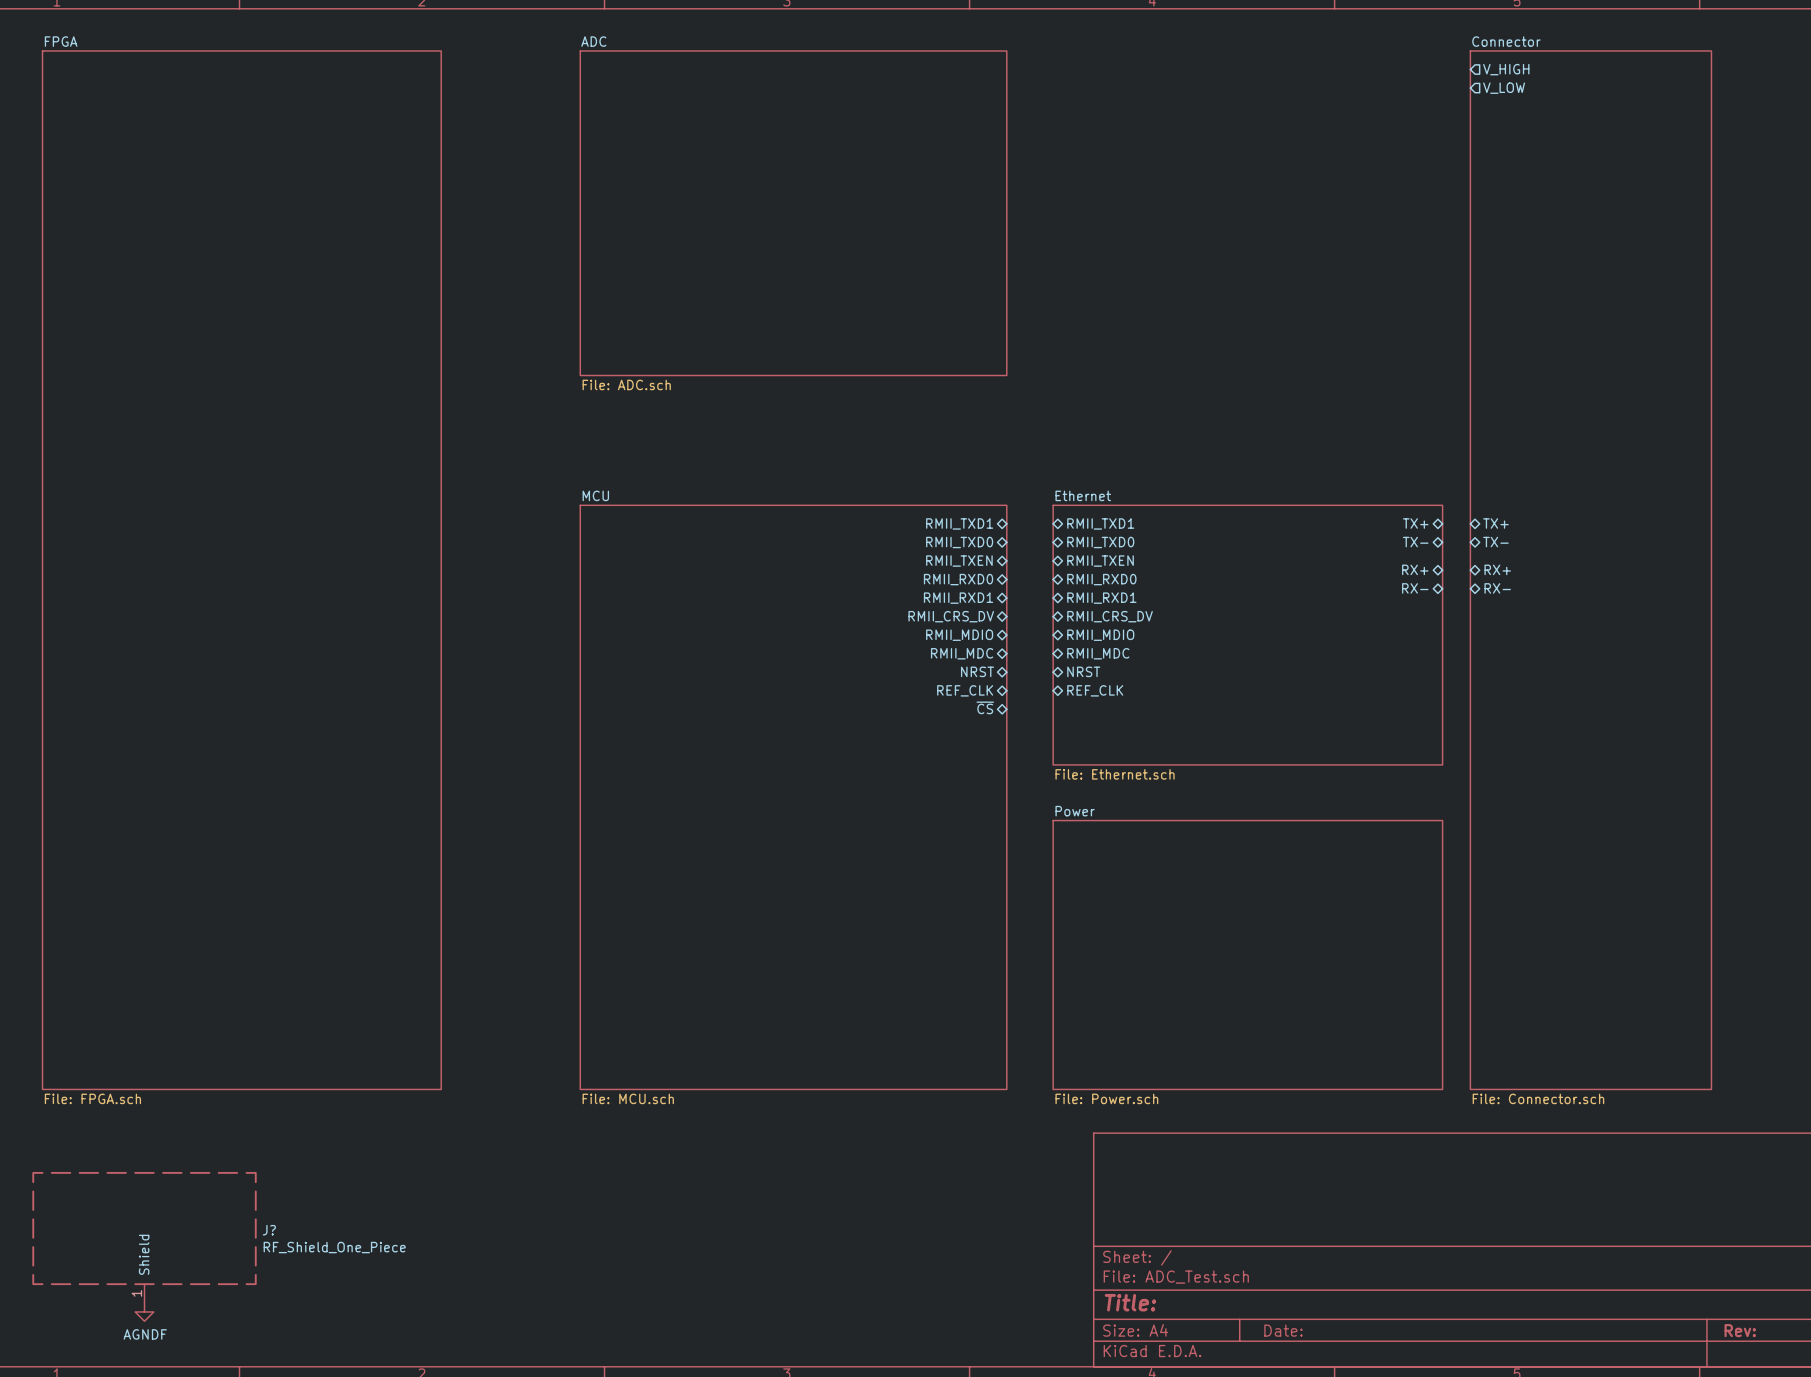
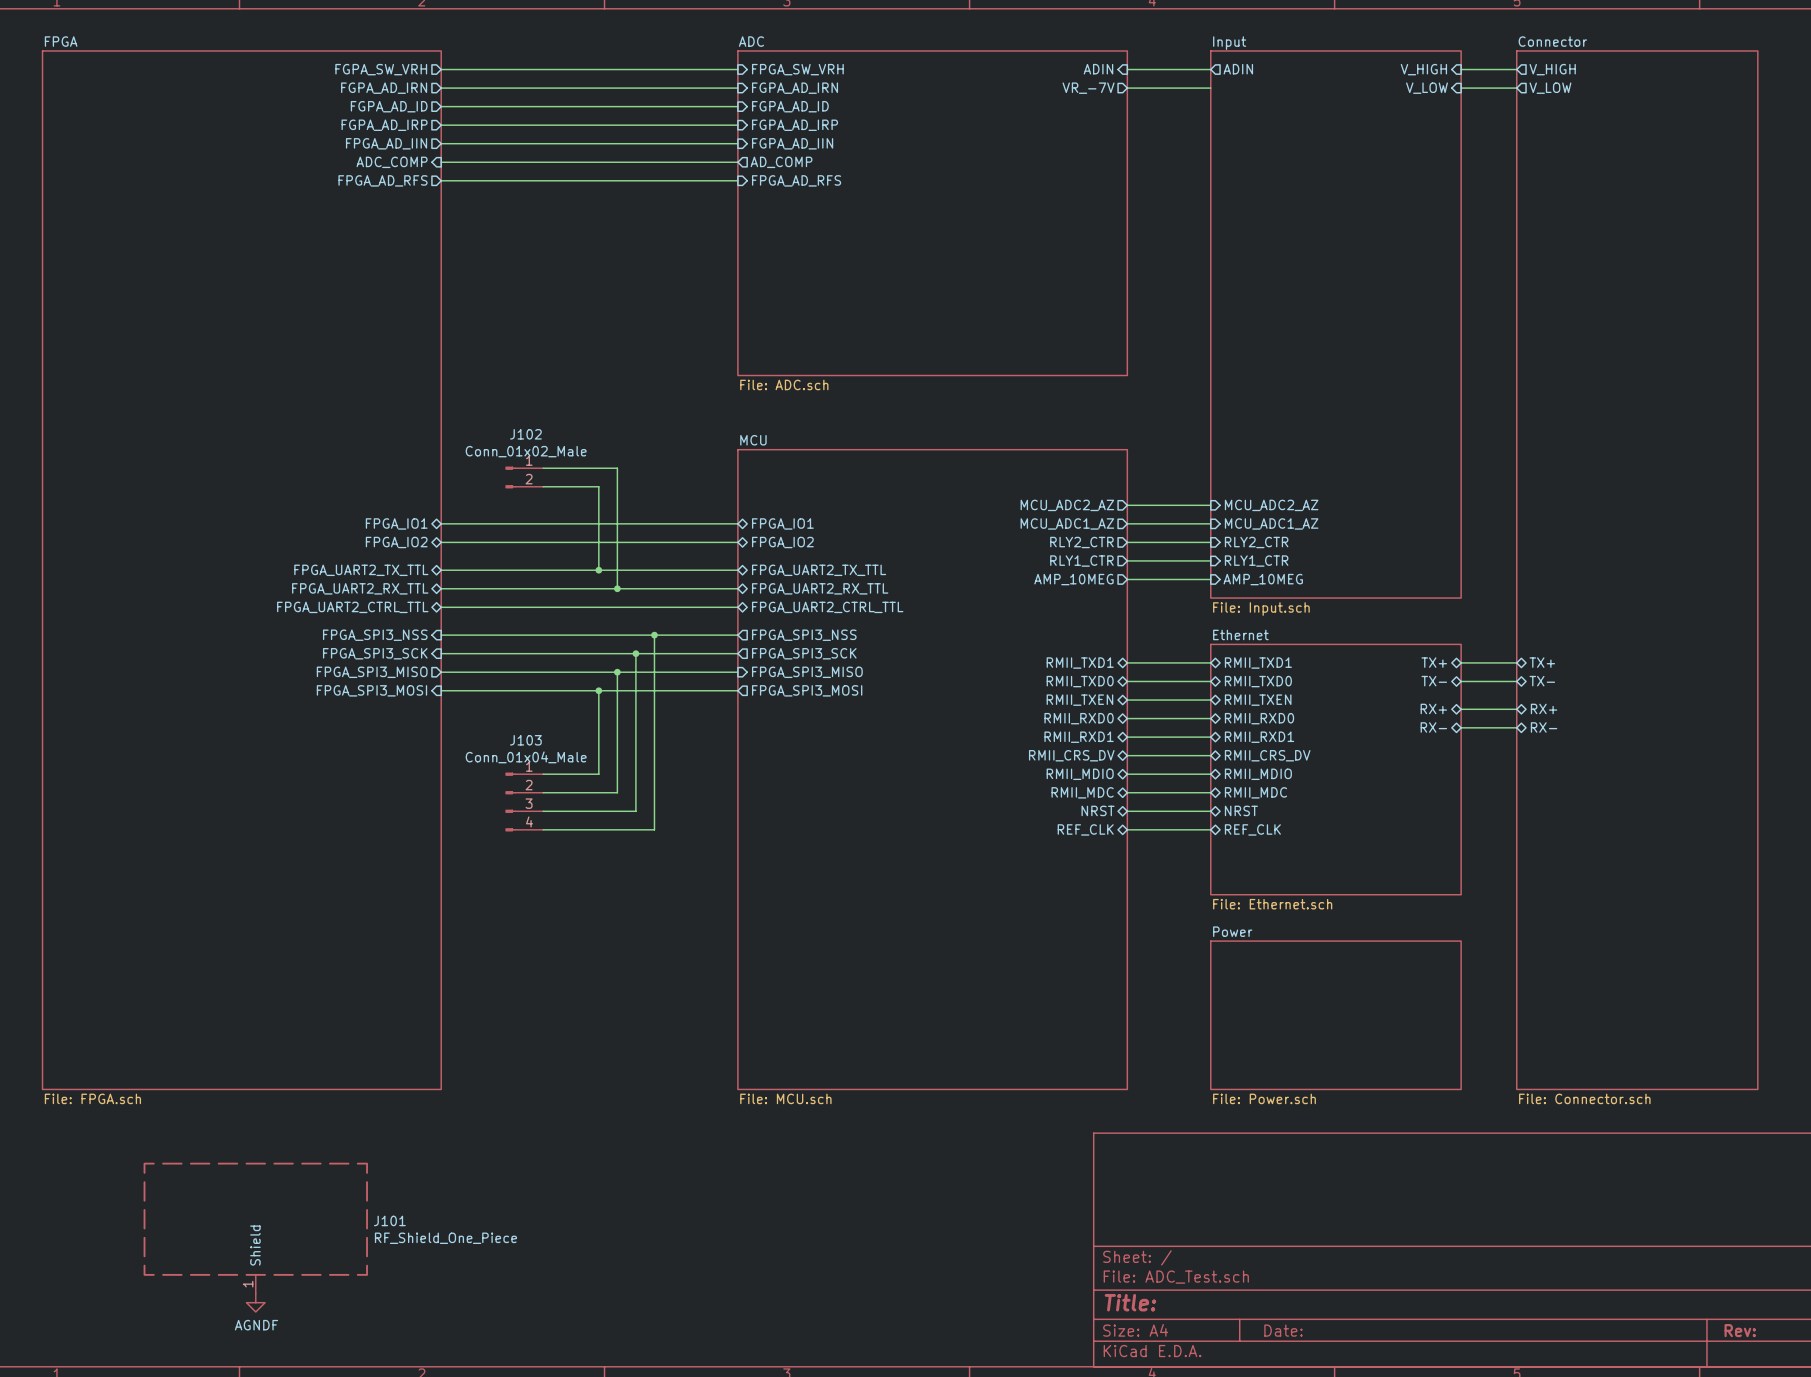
sheet pin: none -> FGPA_SW_VRH (381, 69)
wire: none -> (441, 69) (737, 69)
sheet pin: none -> FPGA_SW_VRH (797, 69)
sheet pin: none -> ADIN (1098, 69)
wire: none -> (1127, 69) (1210, 69)
sheet pin: none -> ADIN (1238, 69)
sheet pin: none -> V_HIGH (1423, 69)
wire: none -> (1461, 69) (1516, 69)
sheet pin position: V_HIGH (1506, 69) -> V_HIGH (1552, 69)
sheet pin: none -> FGPA_AD_IRN (384, 88)
wire: none -> (441, 88) (737, 88)
sheet pin: none -> FGPA_AD_IRN (795, 88)
sheet pin: none -> VR_-7V (1088, 88)
wire: none -> (1127, 88) (1210, 88)
sheet pin: none -> V_LOW (1426, 88)
wire: none -> (1461, 88) (1516, 88)
sheet pin position: V_LOW (1504, 88) -> V_LOW (1550, 88)
sheet pin: none -> FGPA_AD_ID (389, 106)
wire: none -> (441, 106) (737, 106)
sheet pin: none -> FGPA_AD_ID (790, 106)
sheet pin: none -> FGPA_AD_IRP (384, 125)
wire: none -> (441, 125) (737, 125)
sheet pin: none -> FGPA_AD_IRP (795, 125)
sheet pin: none -> FPGA_AD_IIN (386, 143)
wire: none -> (441, 143) (737, 143)
sheet pin: none -> FGPA_AD_IIN (792, 143)
sheet pin: none -> ADC_COMP (392, 162)
wire: none -> (441, 162) (737, 162)
sheet pin: none -> AD_COMP (781, 162)
sheet pin: none -> FPGA_AD_RFS (383, 180)
wire: none -> (441, 180) (737, 180)
sheet pin: none -> FPGA_AD_RFS (796, 180)
sheet ADC: File: ADC.sch (793, 213) -> none
sheet ADC: none -> File: ADC.sch (932, 213)
sheet Input: none -> File: Input.sch (1335, 324)
wire: none -> (543, 468) (617, 468) (617, 588)
J102: none -> Conn_01x02_Male (524, 477)
wire: none -> (543, 486) (598, 486) (598, 570)
sheet pin: none -> MCU_ADC2_AZ (1067, 505)
sheet pin: none -> MCU_ADC2_AZ (1271, 505)
sheet pin: none -> FPGA_IO1 (396, 523)
wire: none -> (441, 523) (737, 523)
sheet pin: none -> FPGA_IO1 (782, 523)
sheet pin: RMII_TXD1 (959, 523) -> none
sheet pin: none -> MCU_ADC1_AZ (1067, 523)
sheet pin: RMII_TXD1 (1100, 523) -> none
wire: none -> (1127, 523) (1210, 523)
sheet pin: none -> MCU_ADC1_AZ (1271, 523)
sheet pin: TX+ (1415, 523) -> none
sheet pin: TX+ (1495, 523) -> none
sheet pin: none -> FPGA_IO2 (396, 542)
wire: none -> (441, 542) (737, 542)
sheet pin: none -> FPGA_IO2 (782, 542)
sheet pin: RMII_TXD0 (959, 542) -> none
sheet pin: none -> RLY2_CTR (1081, 542)
sheet pin: RMII_TXD0 (1100, 542) -> none
wire: none -> (1127, 542) (1210, 542)
sheet pin: none -> RLY2_CTR (1256, 542)
sheet pin: TX- (1415, 542) -> none
sheet pin: TX- (1495, 542) -> none
wire: none -> (1127, 560) (1210, 560)
sheet pin: RMII_TXEN (959, 561) -> none
sheet pin: none -> RLY1_CTR (1081, 561)
sheet pin: RMII_TXEN (1100, 561) -> none
sheet pin: none -> RLY1_CTR (1256, 561)
sheet pin: RX+ (1415, 569) -> none
sheet pin: RX+ (1497, 569) -> none
sheet pin: none -> FPGA_UART2_TX_TTL (361, 570)
wire: none -> (441, 570) (737, 570)
junction: none -> (598, 570)
sheet pin: none -> FPGA_UART2_TX_TTL (819, 570)
sheet Connector position: (1590, 570) -> (1637, 570)
sheet pin: RMII_RXD0 (958, 579) -> none
sheet pin: none -> AMP_10MEG (1073, 579)
sheet pin: RMII_RXD0 (1101, 579) -> none
wire: none -> (1127, 579) (1210, 579)
sheet pin: none -> AMP_10MEG (1263, 579)
sheet pin: none -> FPGA_UART2_RX_TTL (360, 588)
wire: none -> (441, 588) (737, 588)
junction: none -> (617, 588)
sheet pin: none -> FPGA_UART2_RX_TTL (820, 588)
sheet pin: RX- (1415, 588) -> none
sheet pin: RX- (1497, 588) -> none
sheet pin: RMII_RXD1 (958, 598) -> none
sheet pin: RMII_RXD1 (1101, 598) -> none
sheet pin: none -> FPGA_UART2_CTRL_TTL (352, 607)
wire: none -> (441, 607) (737, 607)
sheet pin: none -> FPGA_UART2_CTRL_TTL (827, 607)
sheet pin: RMII_CRS_DV (951, 616) -> none
sheet pin: RMII_CRS_DV (1110, 616) -> none
sheet pin: none -> FPGA_SPI3_NSS (375, 635)
wire: none -> (441, 635) (737, 635)
wire: none -> (654, 635) (654, 829) (543, 829)
junction: none -> (654, 635)
sheet pin: none -> FPGA_SPI3_NSS (804, 635)
sheet pin: RMII_MDIO (959, 635) -> none
sheet pin: RMII_MDIO (1100, 635) -> none
sheet Ethernet: File: Ethernet.sch (1247, 635) -> none
sheet pin: none -> FPGA_SPI3_SCK (375, 653)
wire: none -> (441, 653) (737, 653)
wire: none -> (635, 653) (635, 811) (543, 811)
junction: none -> (635, 653)
sheet pin: none -> FPGA_SPI3_SCK (804, 653)
sheet pin: RMII_MDC (962, 653) -> none
sheet pin: RMII_MDC (1098, 653) -> RMII_TXD1 (1080, 663)
wire: none -> (1127, 662) (1210, 662)
sheet pin: none -> TX+ (1434, 662)
wire: none -> (1461, 662) (1516, 662)
sheet pin: none -> TX+ (1542, 662)
sheet pin: none -> RMII_TXD1 (1258, 663)
sheet pin: NRST (977, 671) -> none
sheet pin: NRST (1083, 671) -> none
sheet pin: none -> FPGA_SPI3_MISO (372, 672)
wire: none -> (441, 672) (737, 672)
wire: none -> (617, 672) (617, 792) (543, 792)
junction: none -> (617, 672)
sheet pin: none -> FPGA_SPI3_MISO (807, 672)
sheet pin: none -> RMII_TXD0 (1080, 681)
wire: none -> (1127, 681) (1210, 681)
sheet pin: none -> RMII_TXD0 (1258, 681)
sheet pin: none -> TX- (1434, 681)
wire: none -> (1461, 681) (1516, 681)
sheet pin: none -> TX- (1542, 681)
sheet pin: none -> FPGA_SPI3_MOSI (371, 690)
wire: none -> (441, 690) (737, 690)
wire: none -> (598, 690) (598, 774) (543, 774)
junction: none -> (598, 690)
sheet pin: none -> FPGA_SPI3_MOSI (807, 690)
sheet pin: REF_CLK (965, 690) -> none
sheet pin: REF_CLK (1095, 690) -> none
sheet pin: none -> RMII_TXEN (1079, 700)
wire: none -> (1127, 700) (1210, 700)
sheet pin: none -> RMII_TXEN (1258, 700)
sheet pin: ~{CS} (985, 707) -> none
sheet pin: none -> RX+ (1433, 708)
sheet pin: none -> RX+ (1544, 708)
wire: none -> (1461, 709) (1516, 709)
sheet pin: none -> RMII_RXD0 (1079, 718)
wire: none -> (1127, 718) (1210, 718)
sheet pin: none -> RMII_RXD0 (1259, 718)
sheet pin: none -> RX- (1433, 727)
wire: none -> (1461, 727) (1516, 727)
sheet pin: none -> RX- (1544, 727)
sheet pin: none -> RMII_RXD1 (1079, 737)
wire: none -> (1127, 737) (1210, 737)
sheet pin: none -> RMII_RXD1 (1259, 737)
sheet pin: none -> RMII_CRS_DV (1071, 755)
wire: none -> (1127, 755) (1210, 755)
sheet pin: none -> RMII_CRS_DV (1267, 755)
sheet MCU: none -> File: MCU.sch (932, 769)
sheet Ethernet: none -> File: Ethernet.sch (1335, 769)
sheet pin: none -> RMII_MDIO (1080, 774)
wire: none -> (1127, 774) (1210, 774)
sheet pin: none -> RMII_MDIO (1258, 774)
sheet pin: none -> RMII_MDC (1082, 792)
wire: none -> (1127, 792) (1210, 792)
sheet pin: none -> RMII_MDC (1255, 792)
sheet MCU: File: MCU.sch (793, 797) -> none
J103: none -> Conn_01x04_Male (524, 802)
sheet pin: none -> NRST (1098, 810)
sheet pin: none -> NRST (1241, 810)
wire: none -> (1127, 811) (1210, 811)
sheet pin: none -> REF_CLK (1085, 829)
wire: none -> (1127, 829) (1210, 829)
sheet pin: none -> REF_CLK (1252, 829)
sheet Power: File: Power.sch (1247, 955) -> none
sheet Power: none -> File: Power.sch (1335, 1015)
J101: none -> RF_Shield_One_Piece (255, 1228)
J?: RF_Shield_One_Piece (144, 1237) -> none
power symbol position: AGNDF (144, 1311) -> AGNDF (255, 1302)

